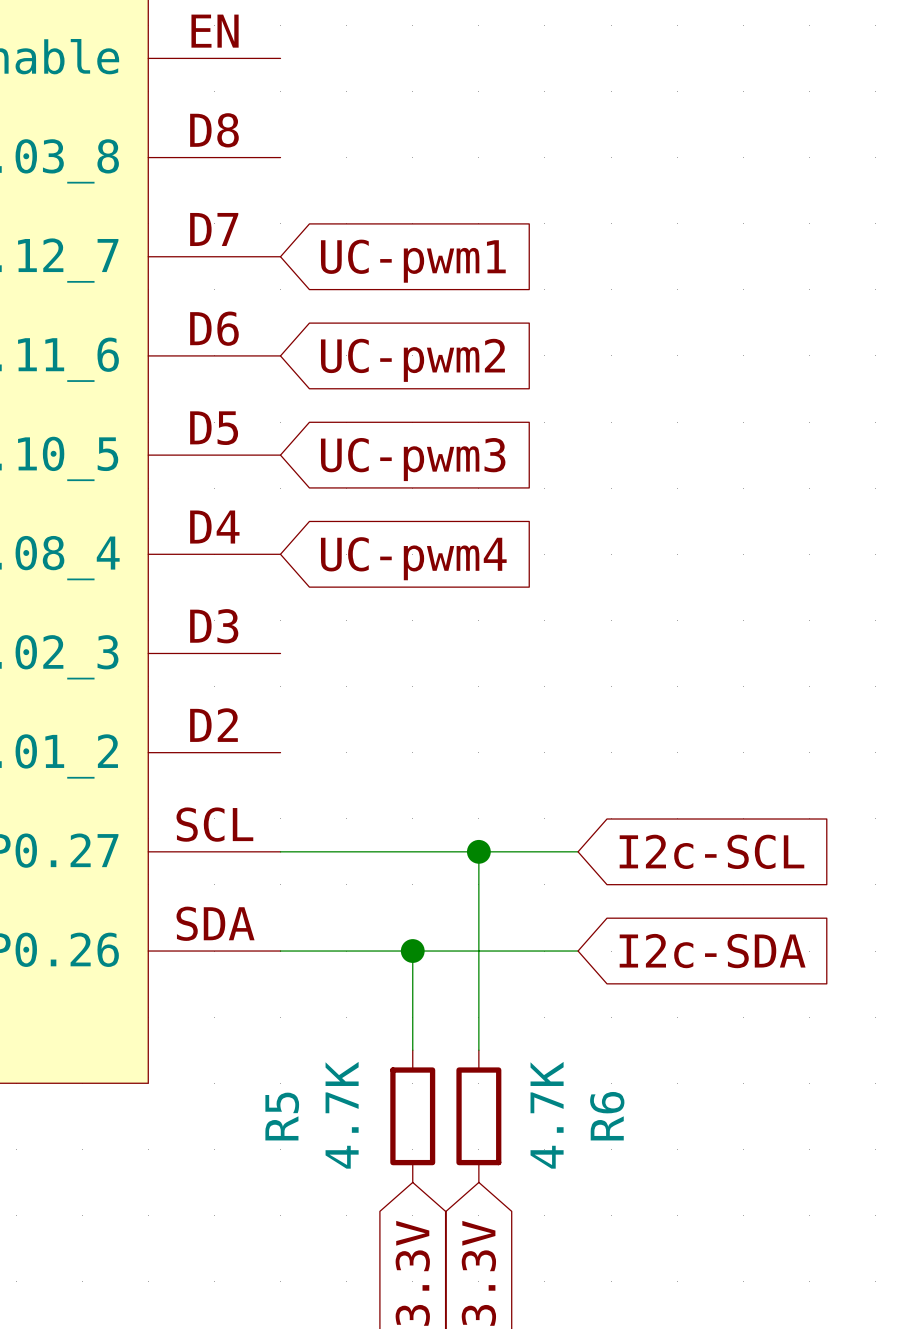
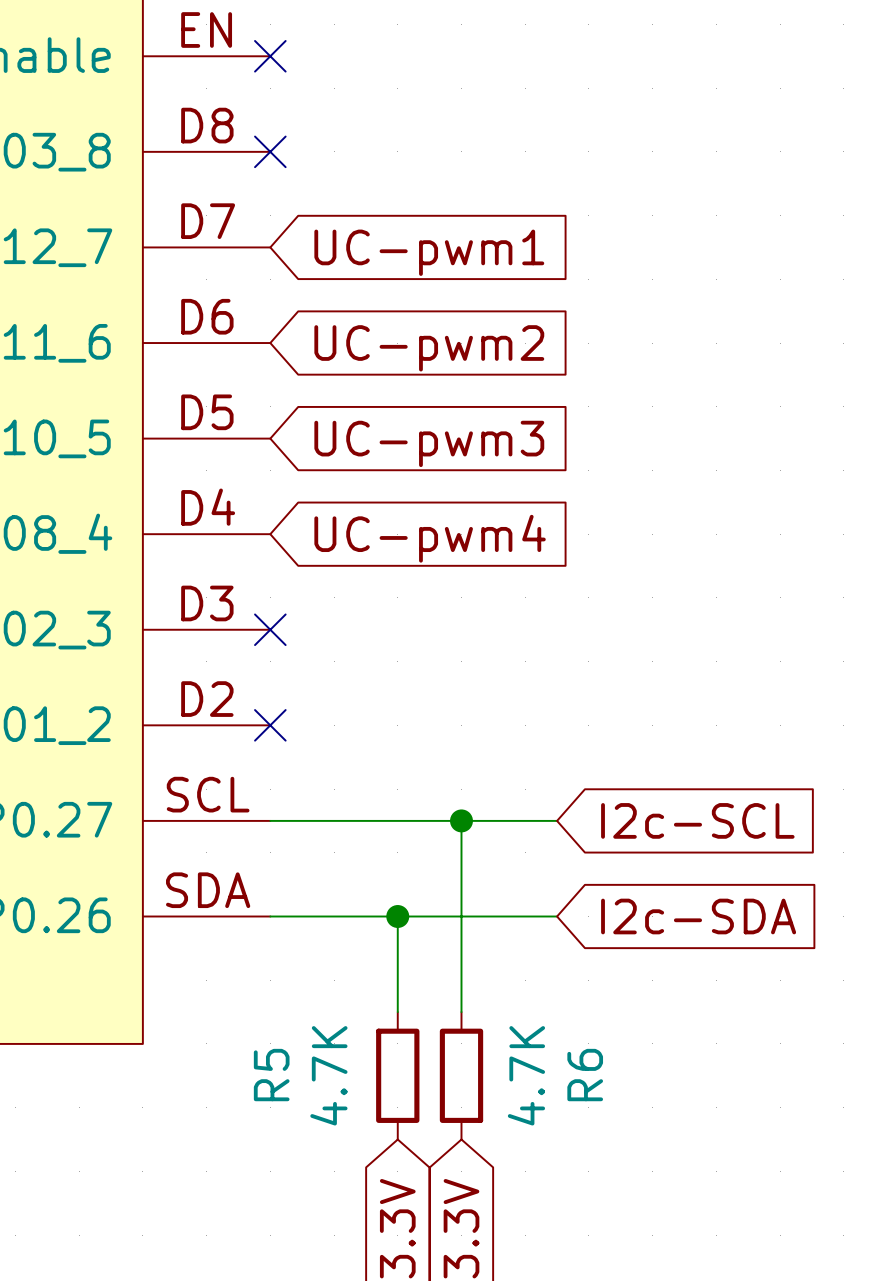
no-connect mark: none -> (270, 56)
no-connect mark: none -> (270, 151)
no-connect mark: none -> (270, 629)
no-connect mark: none -> (270, 725)

